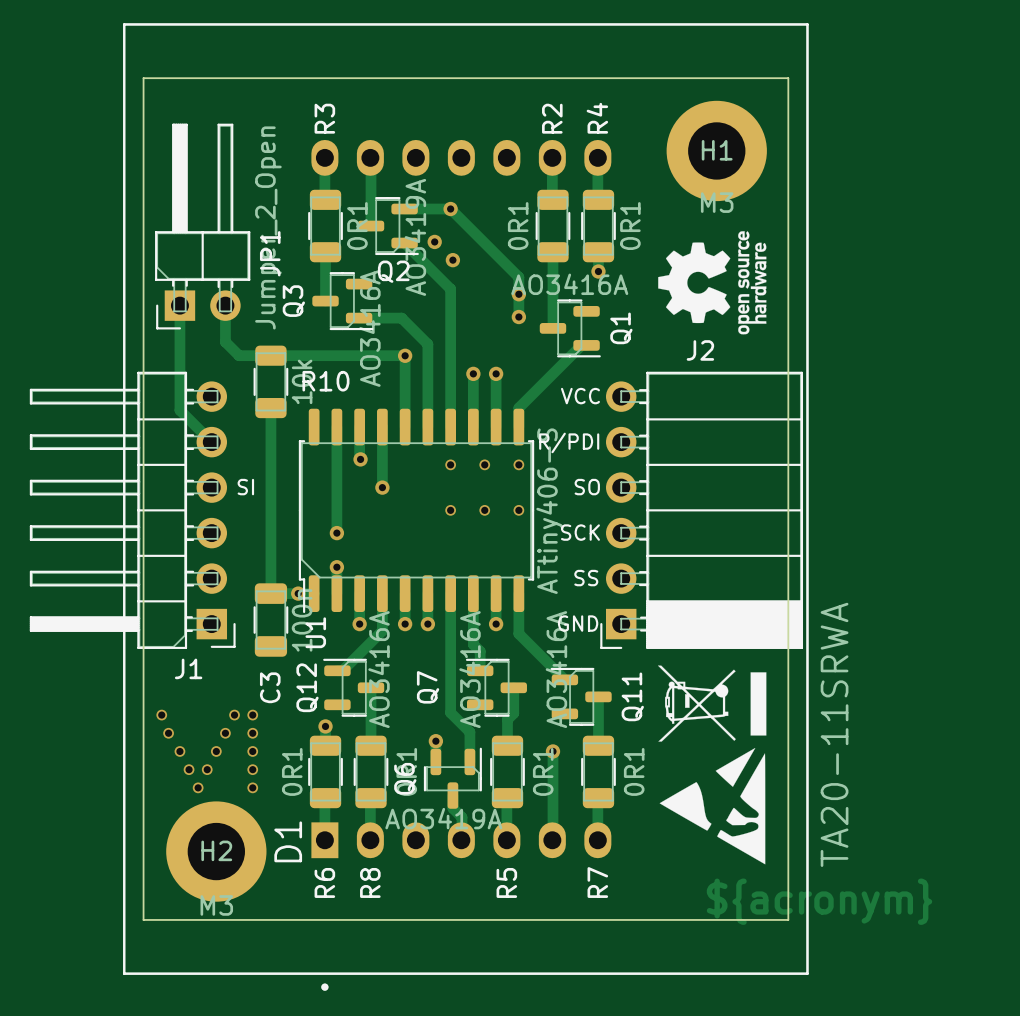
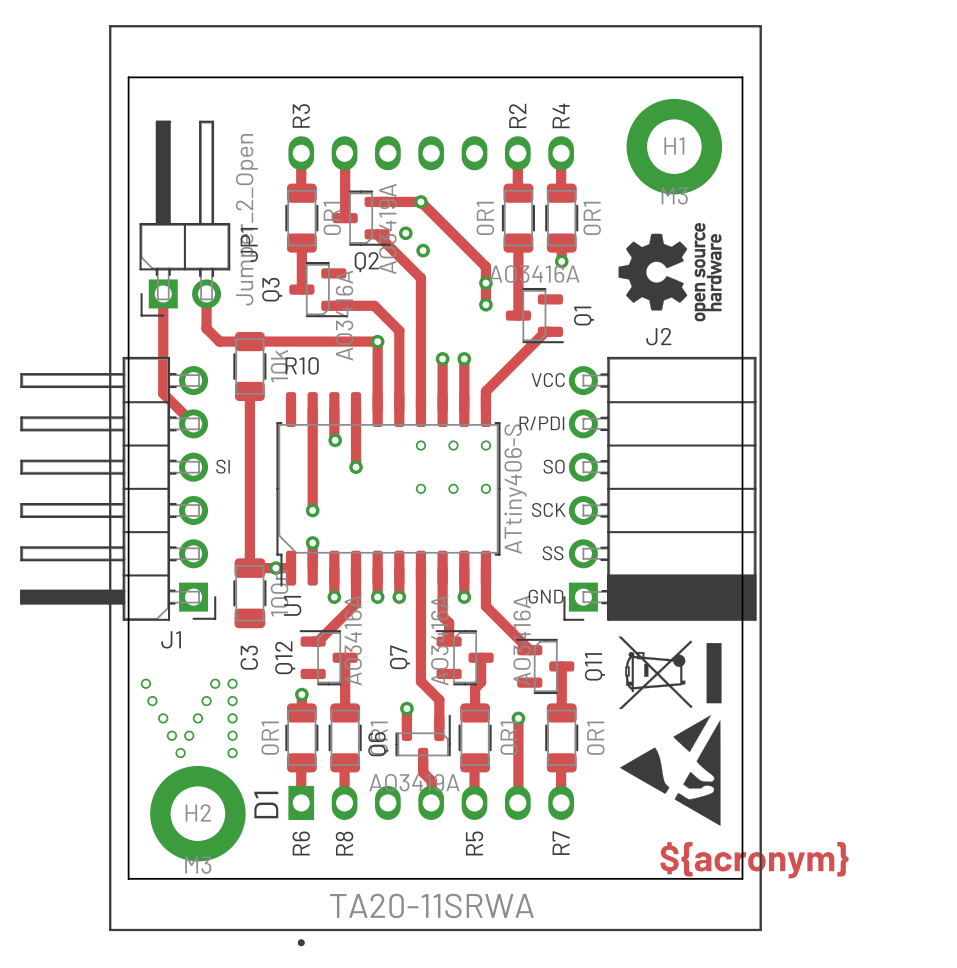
D1 value rotation: 0° (834, 734) -> 90° clockwise (431, 905)
D1 value position: TA20-11SRWA (834, 734) -> TA20-11SRWA (431, 905)

